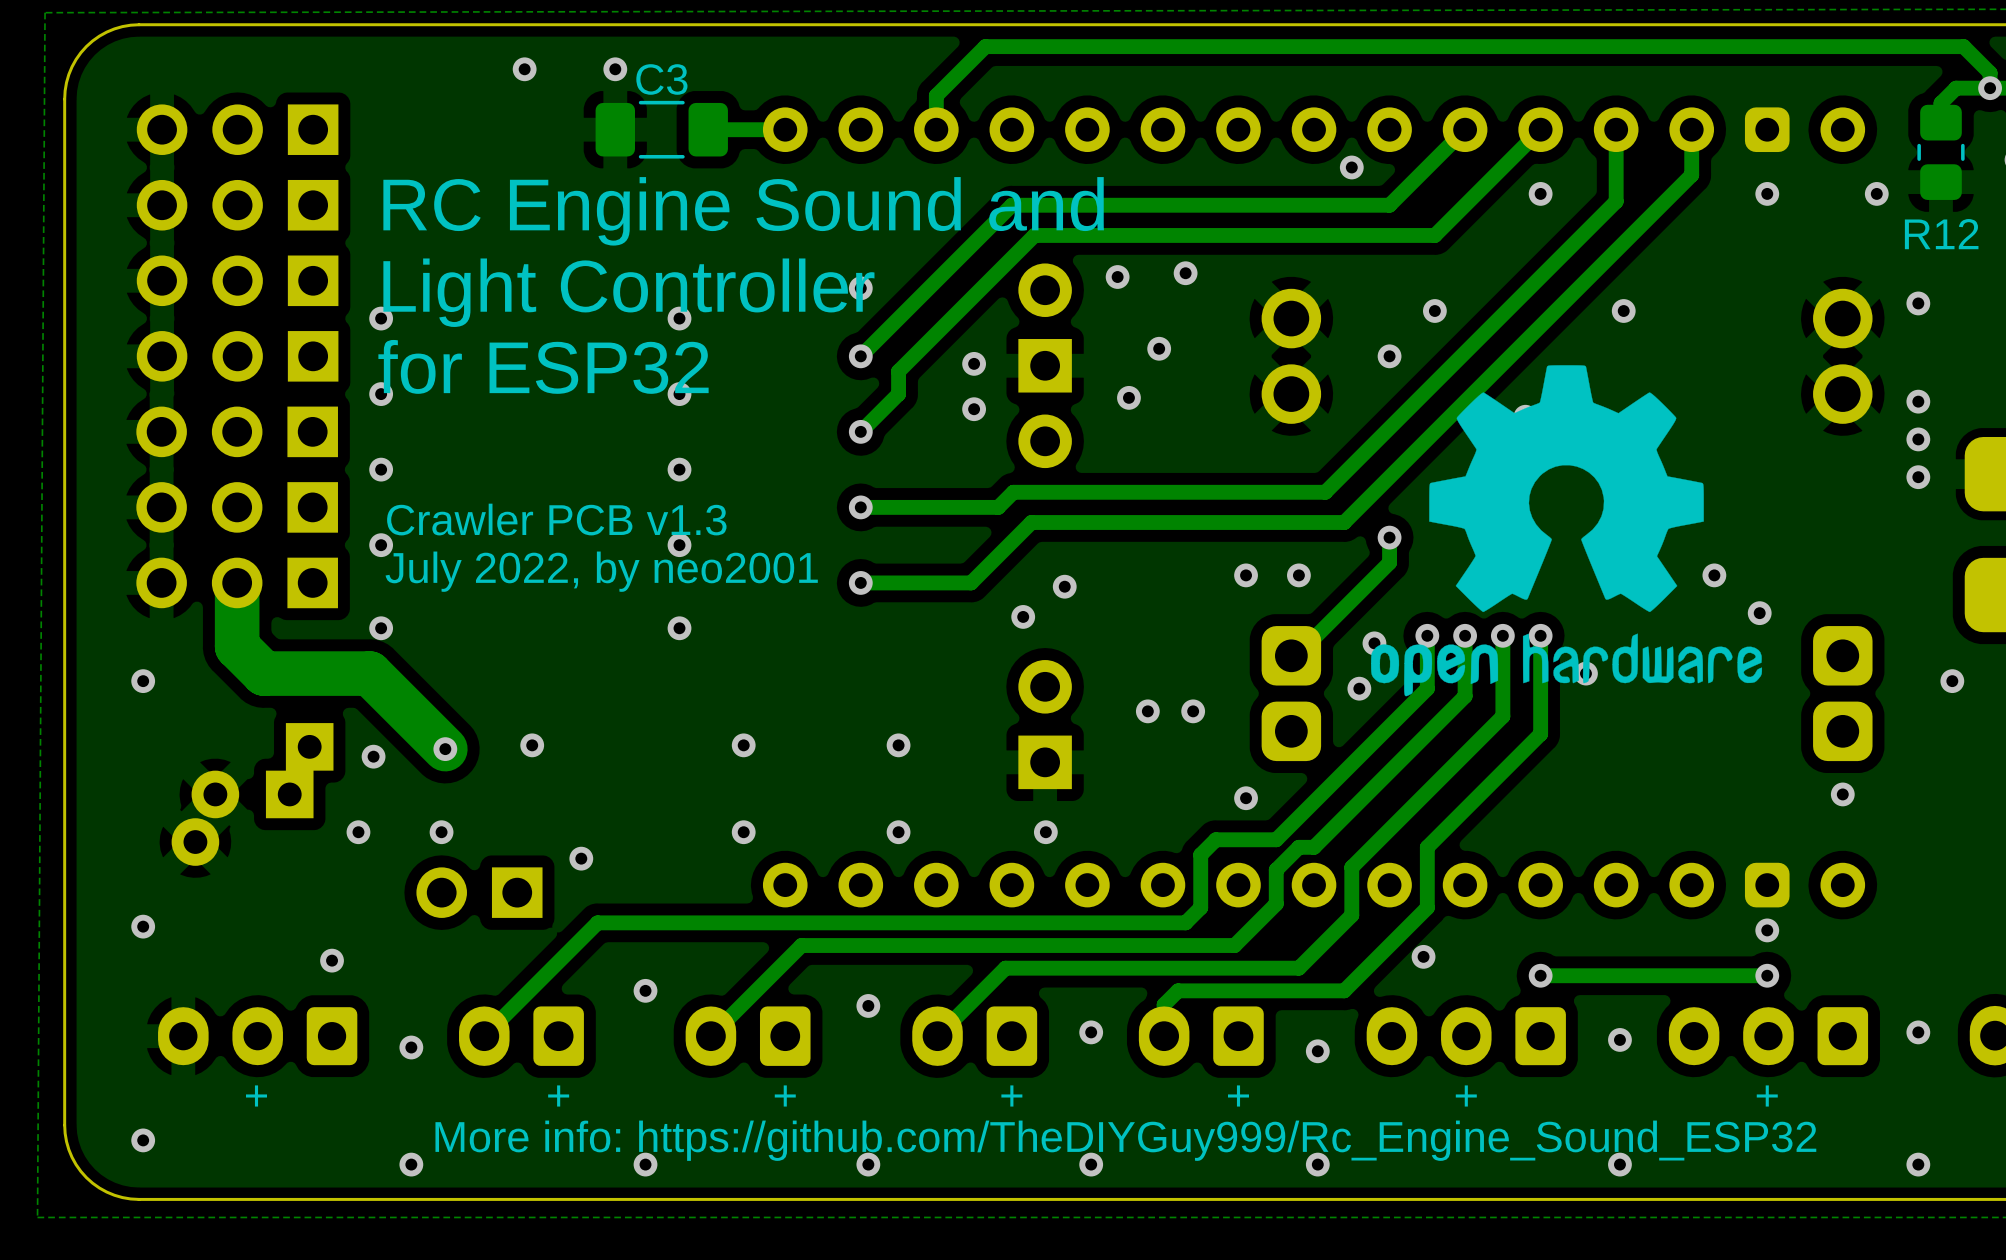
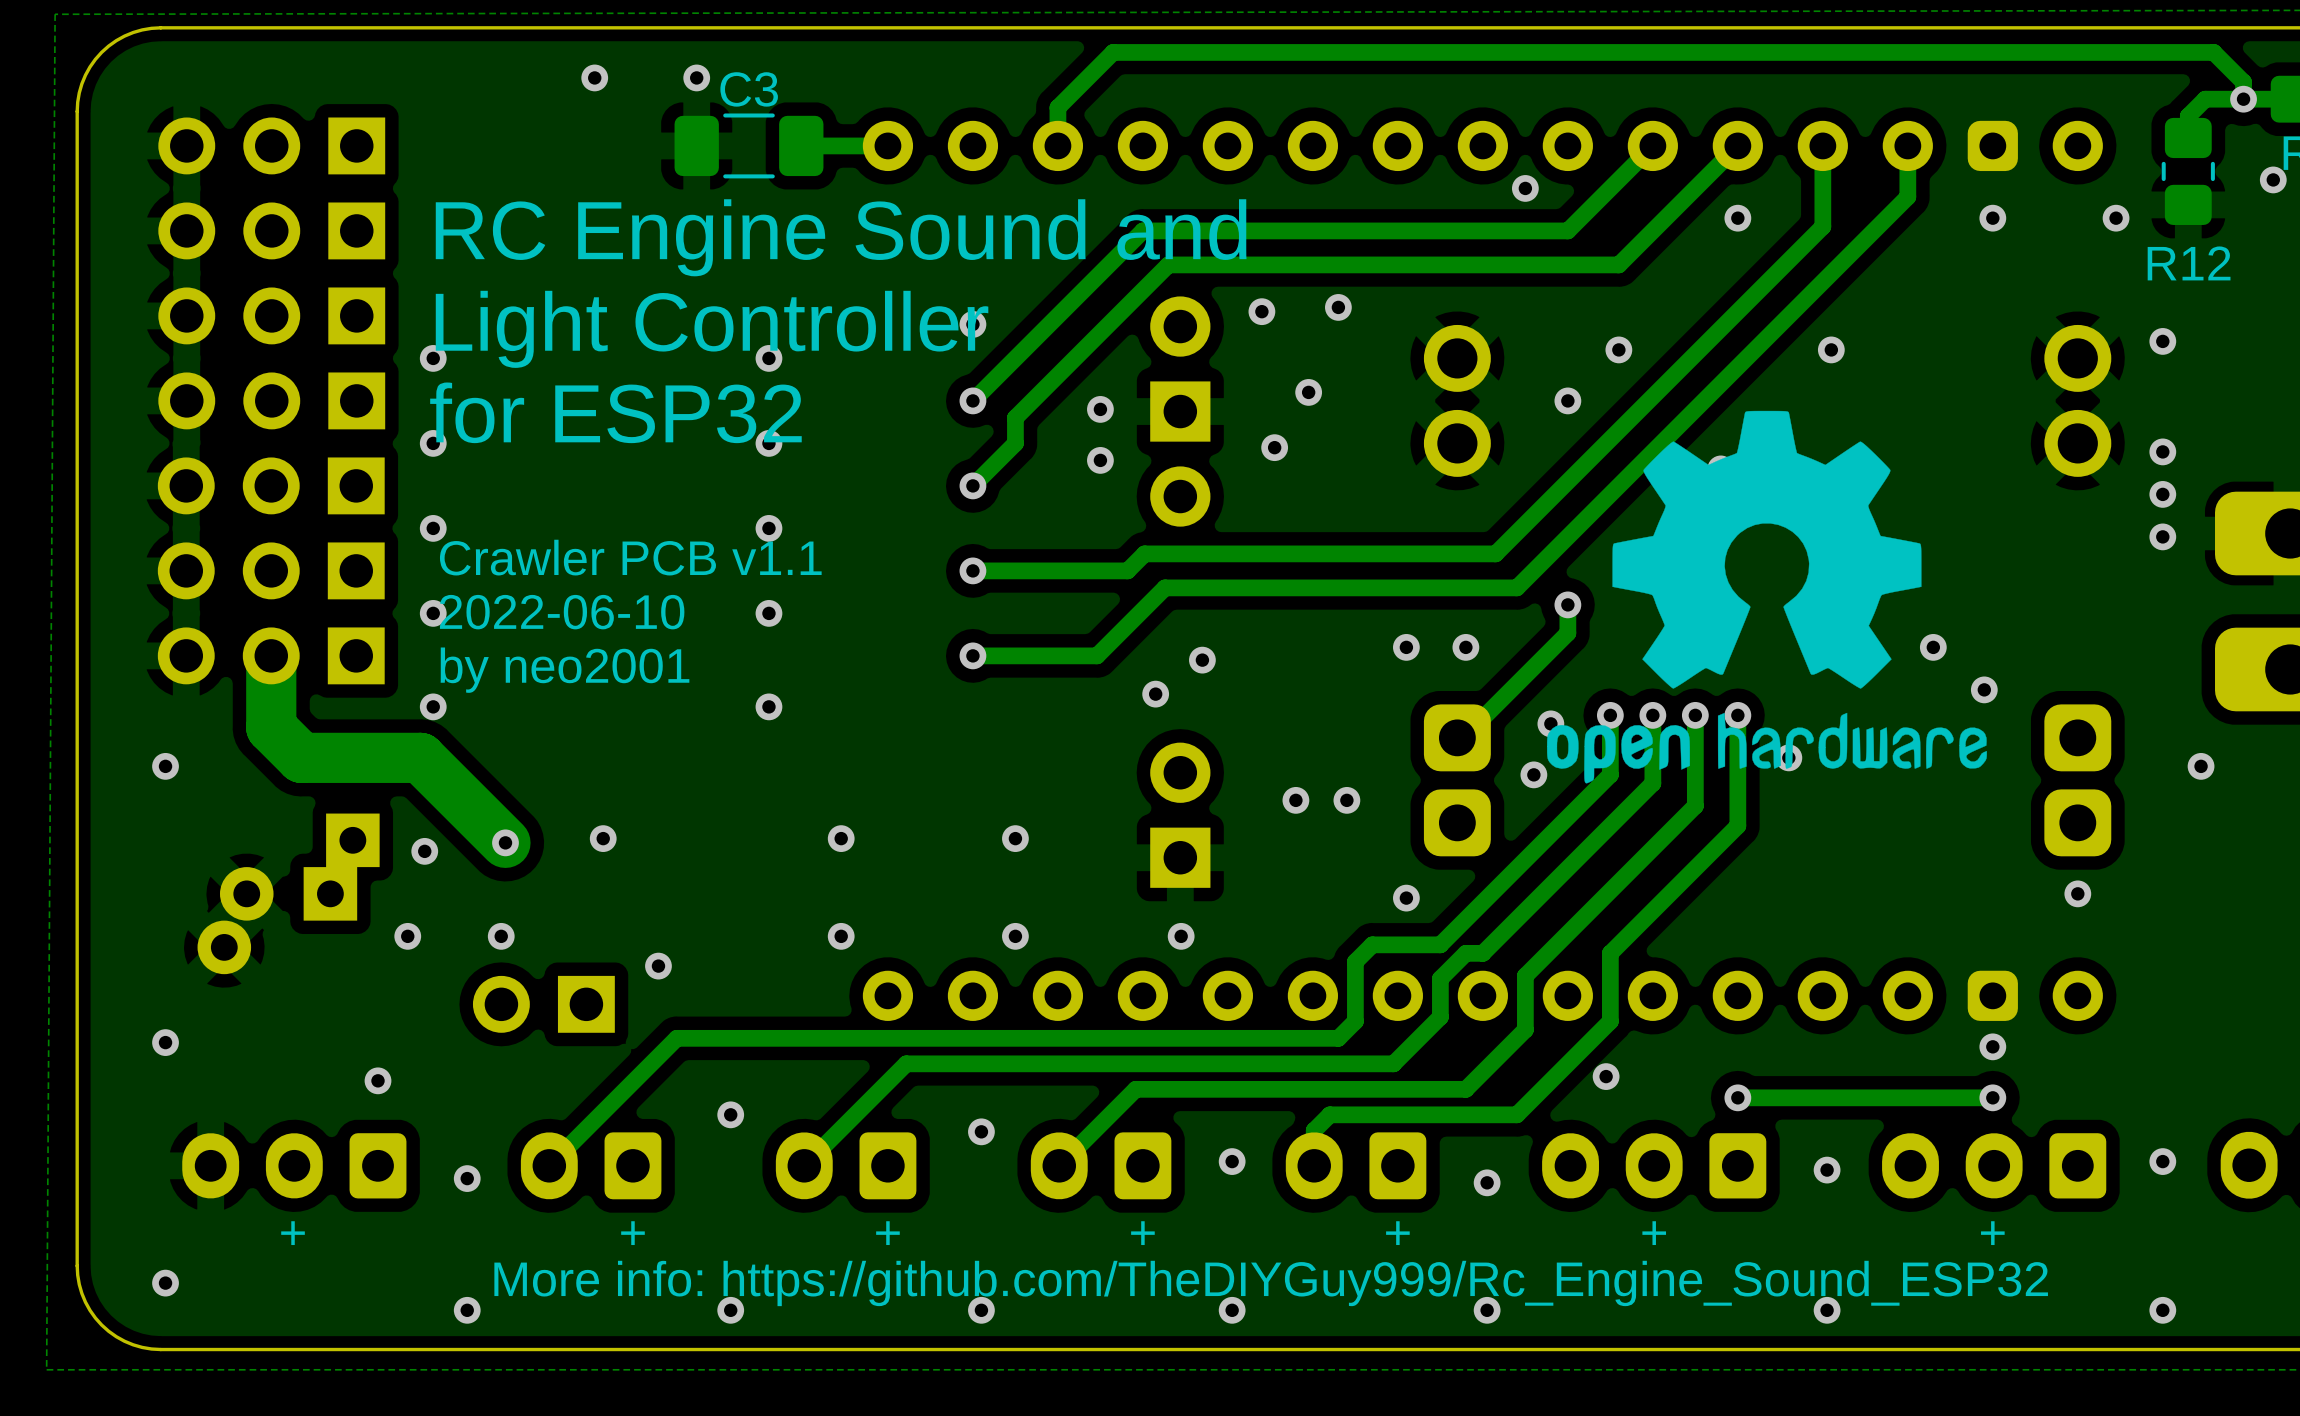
text: Crawler PCB v1.3 (556, 519) -> Crawler PCB v1.1 (630, 557)
text: none -> 2022-06-10 (562, 612)
text: July 2022, by neo2001 (601, 571) -> by neo2001 (564, 670)

